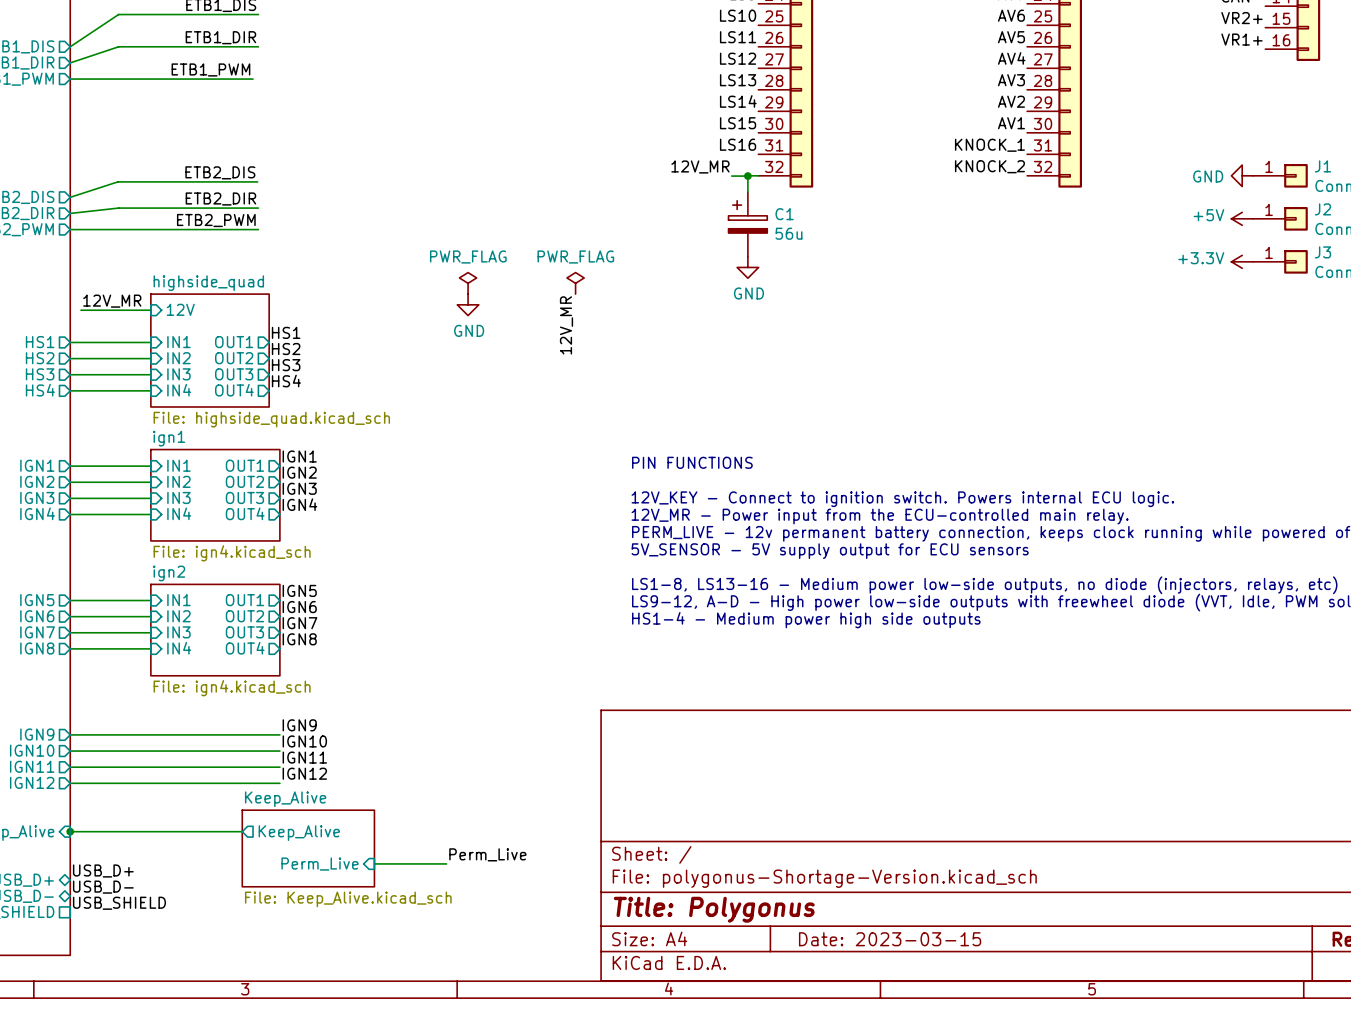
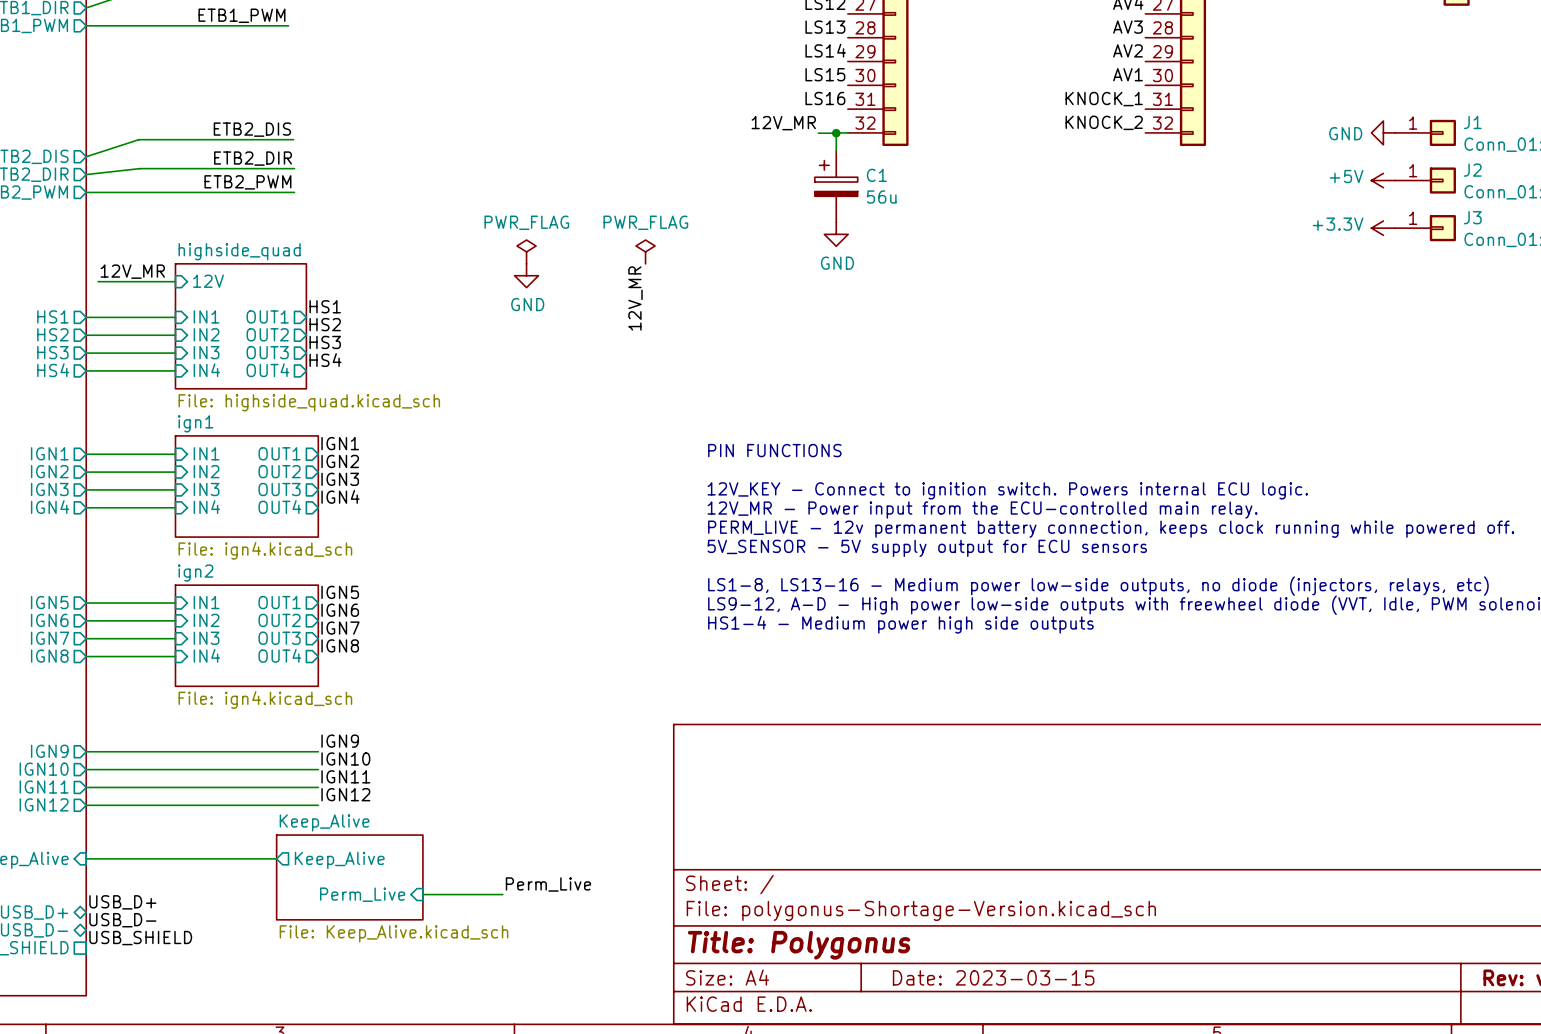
junction: (70, 831) -> none

